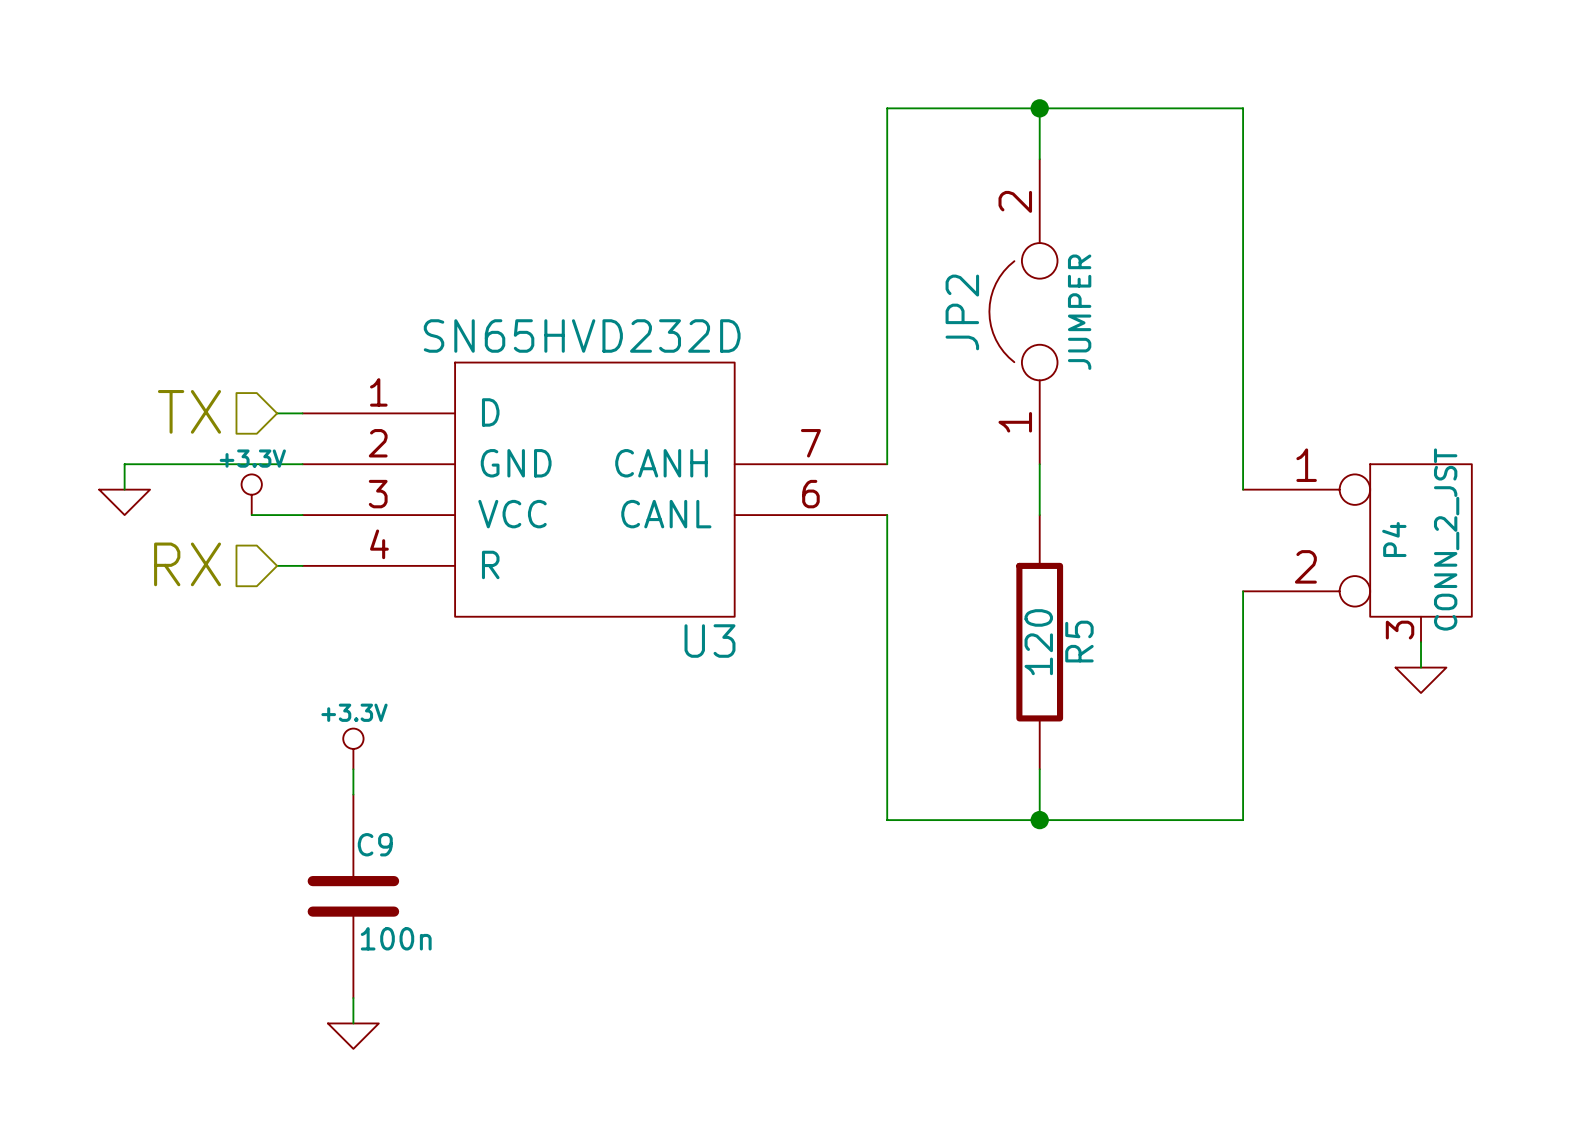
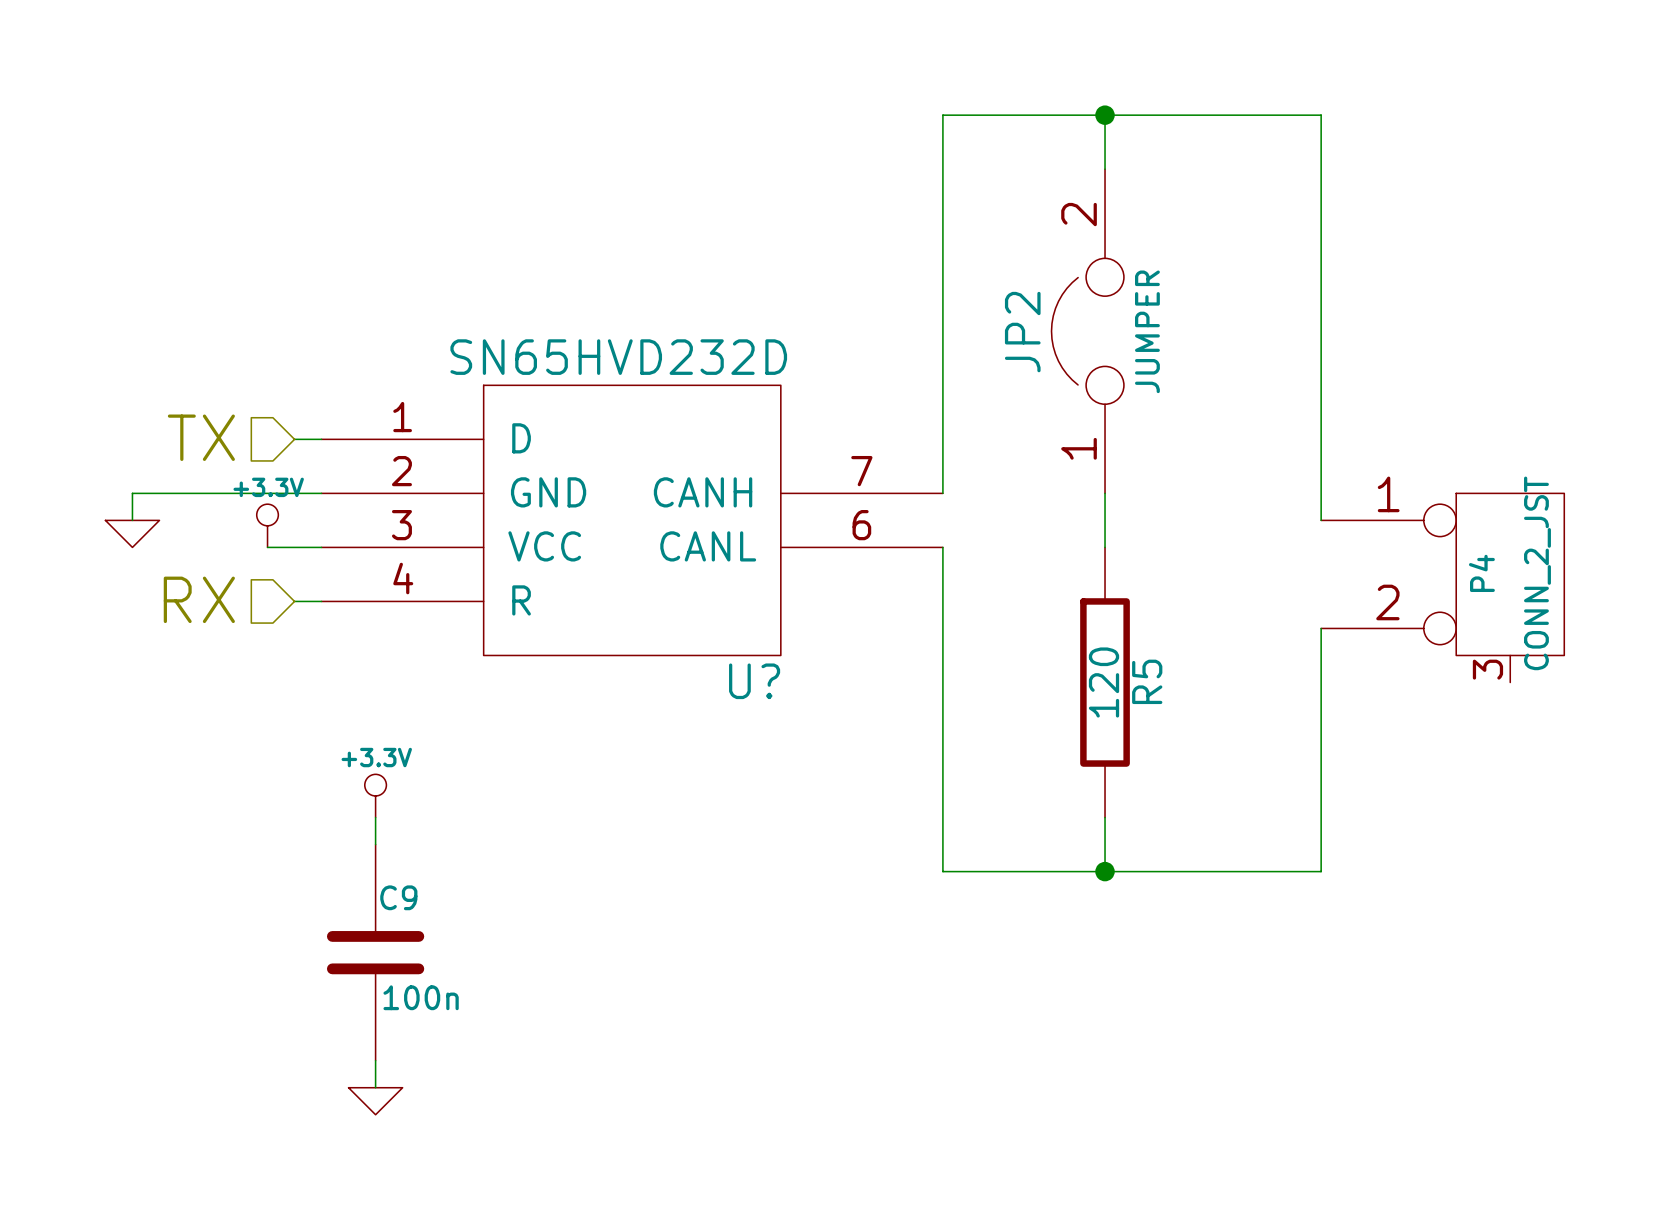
U3 name: U3 (709, 641) -> U? (754, 681)
wire: (1421, 642) (1421, 667) -> none
power symbol: (1421, 680) -> none

